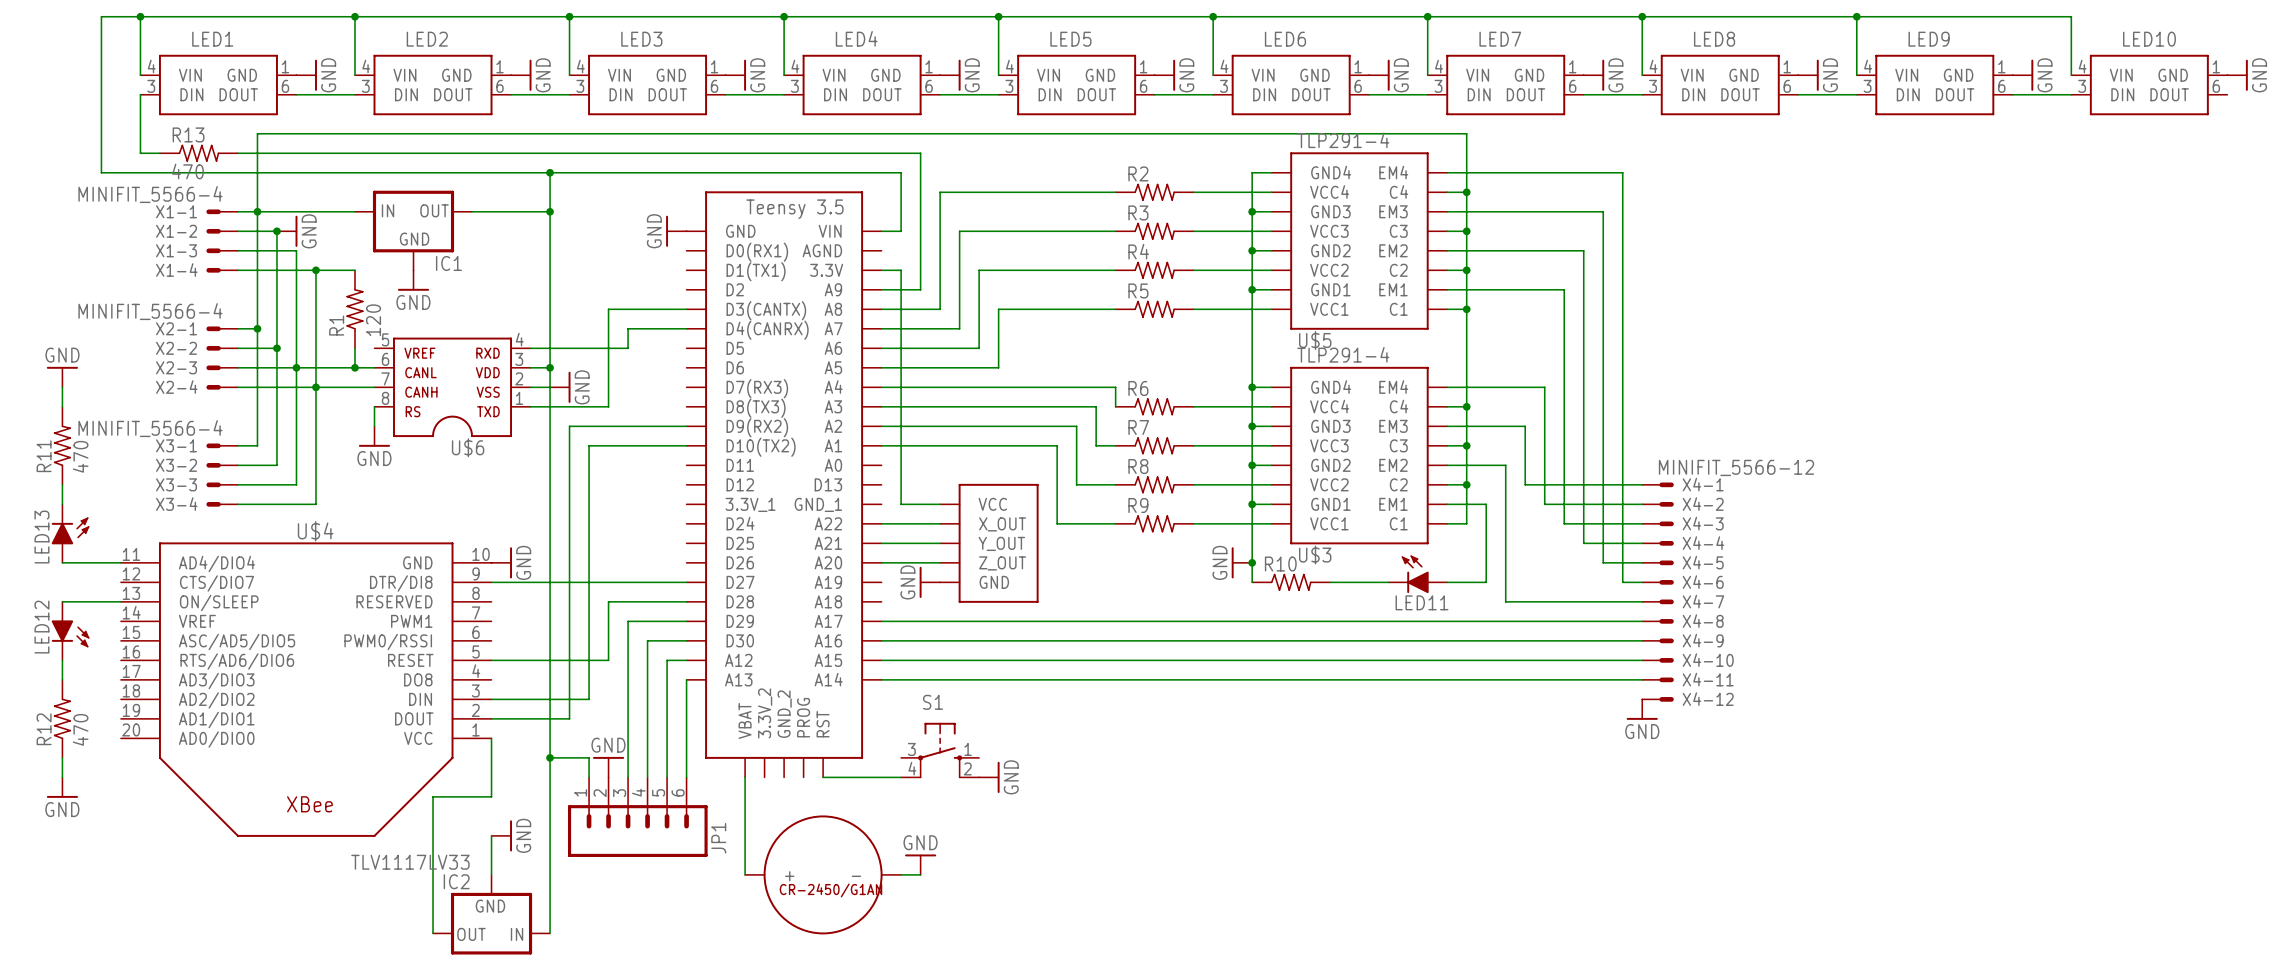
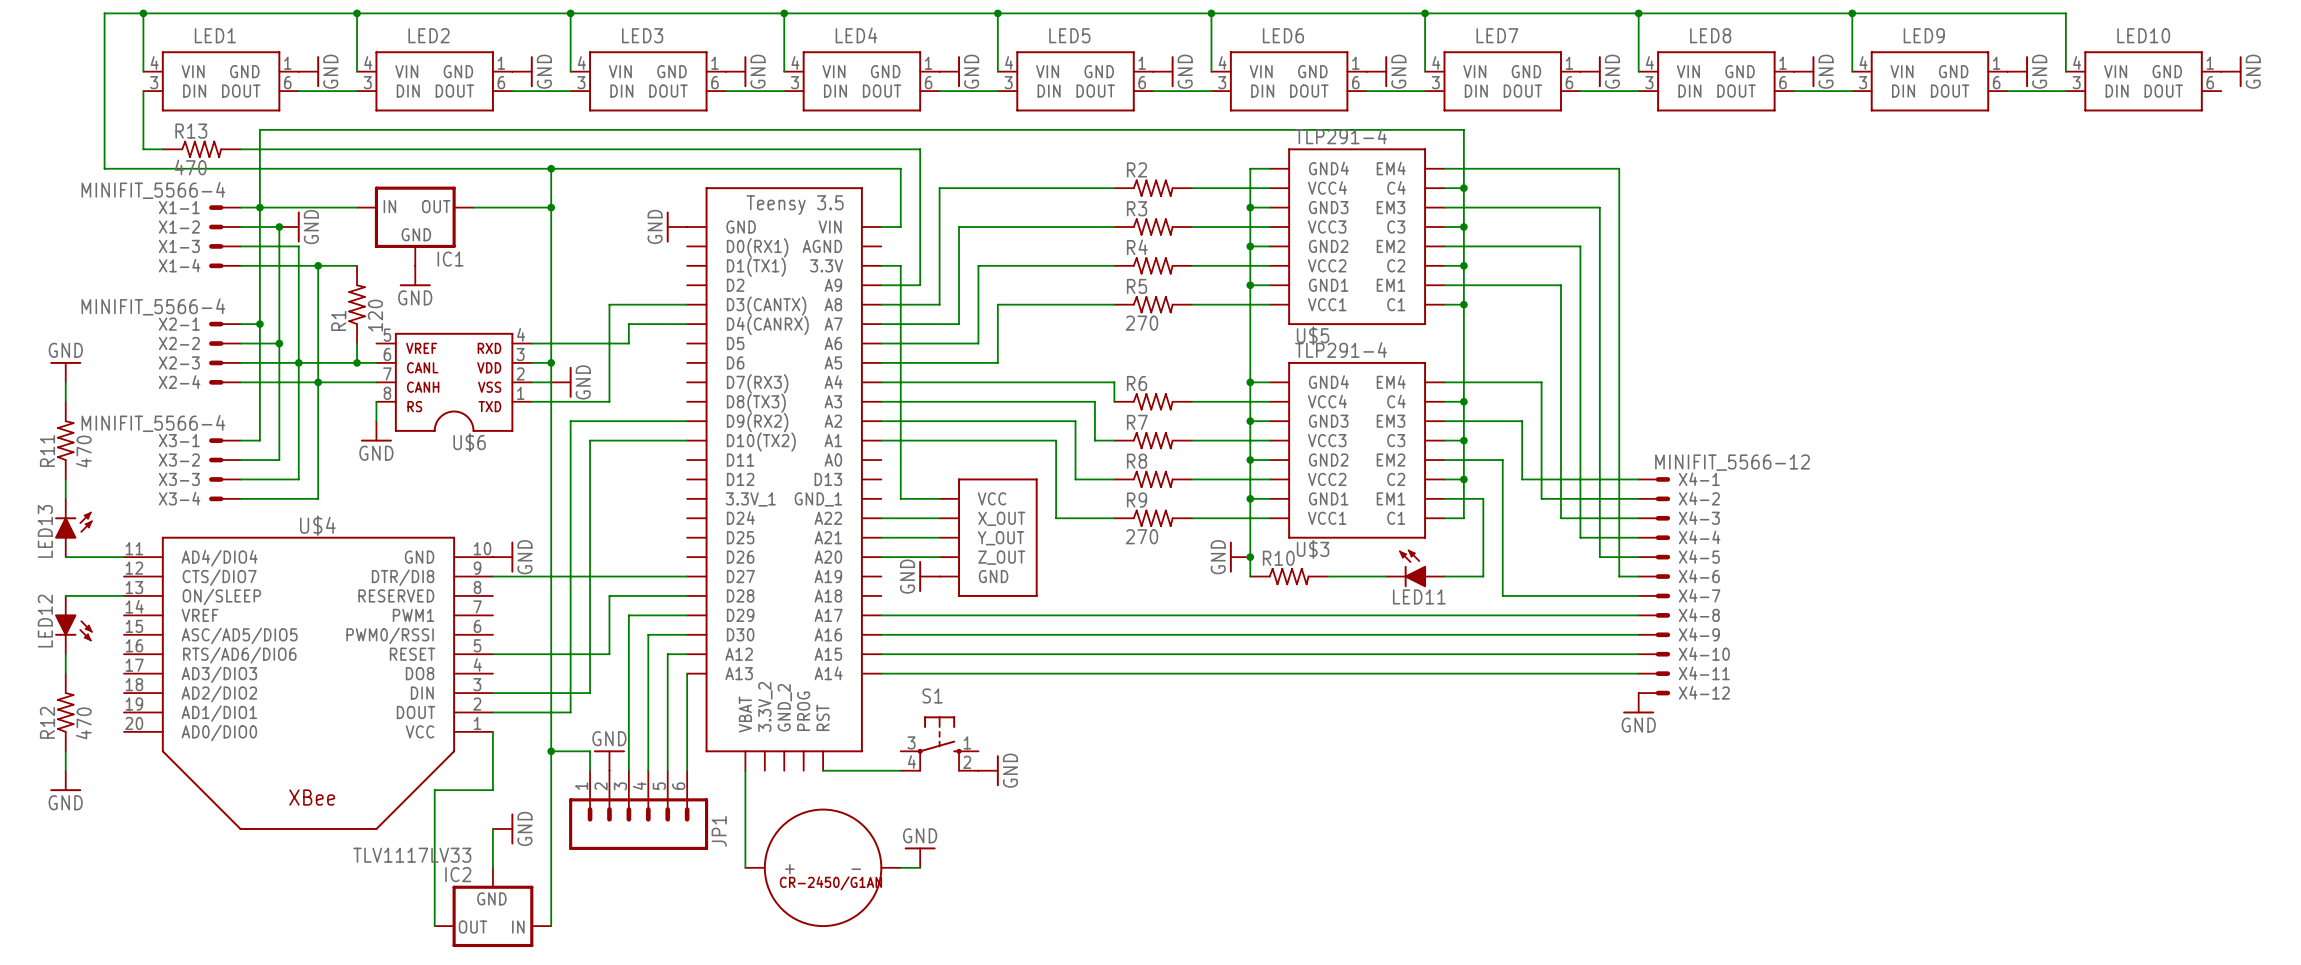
R5 value: none -> 270 (1141, 323)
R9 value: none -> 270 (1141, 536)

